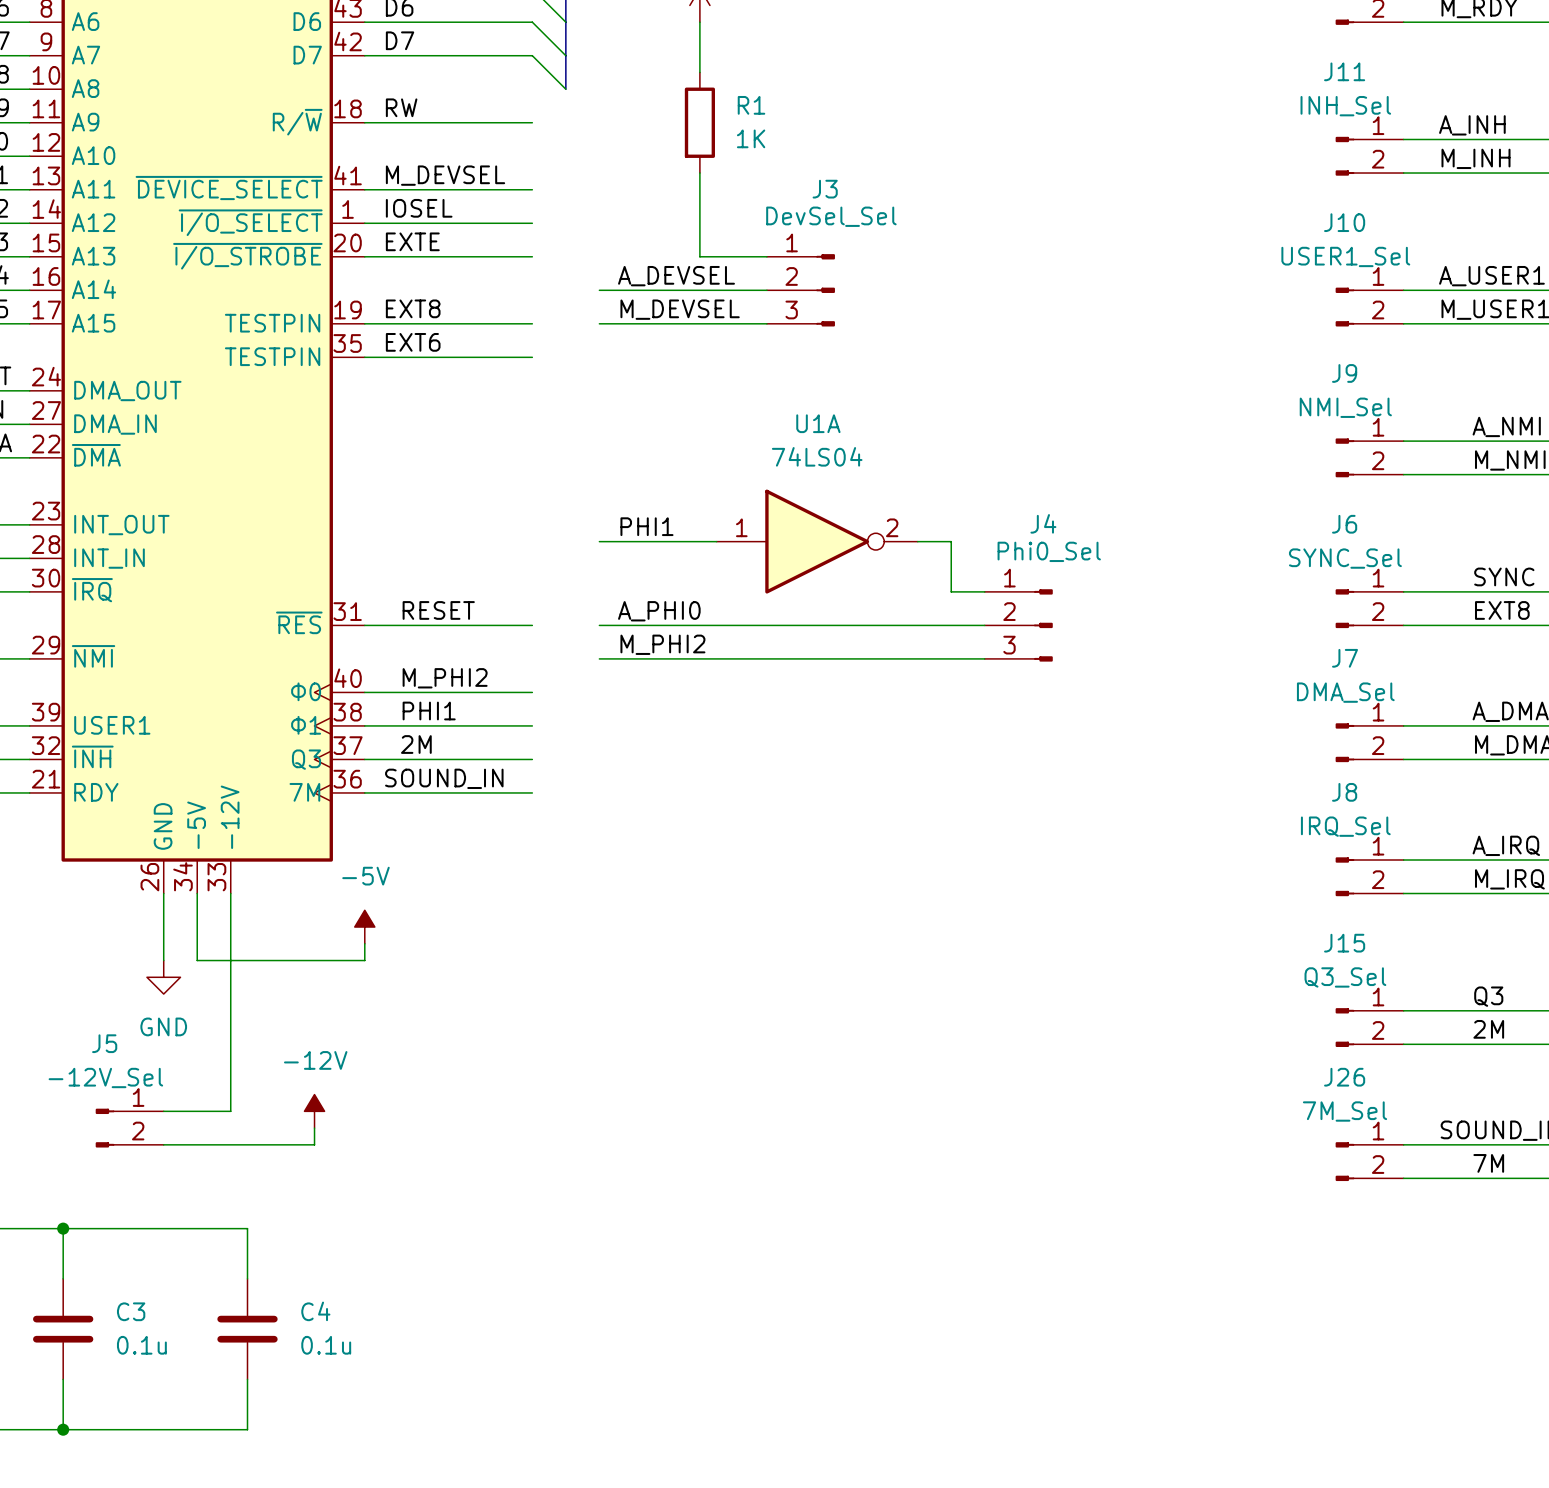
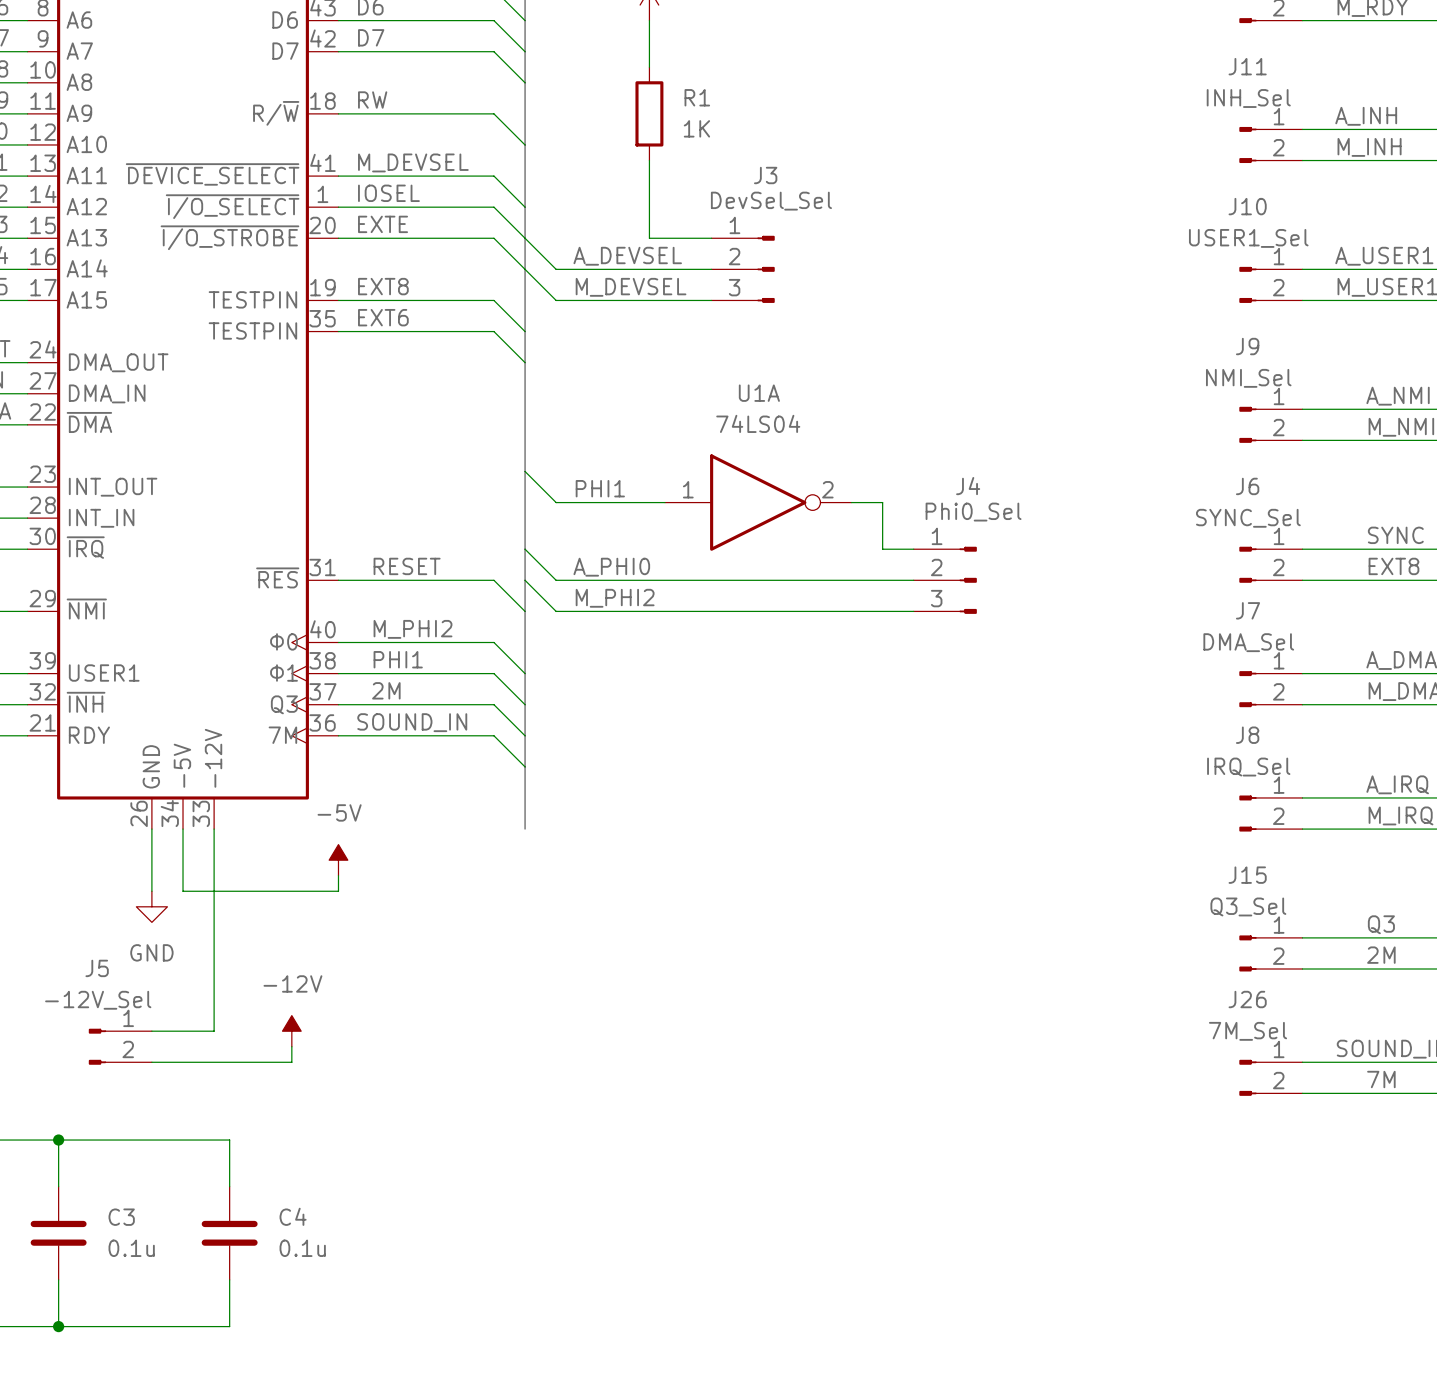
bus: none -> (525, 82) (525, 829)
wire: none -> (493, 113) (525, 144)
wire: none -> (493, 176) (525, 207)
wire: none -> (493, 207) (556, 269)
wire: none -> (493, 238) (556, 300)
wire: none -> (493, 300) (525, 331)
wire: none -> (493, 331) (525, 362)
wire: none -> (525, 471) (556, 502)
wire: none -> (525, 549) (556, 580)
wire: none -> (493, 580) (525, 611)
wire: none -> (525, 580) (556, 611)
wire: none -> (493, 642) (525, 673)
wire: none -> (493, 673) (525, 704)
wire: none -> (493, 704) (525, 735)
wire: none -> (493, 735) (525, 766)

